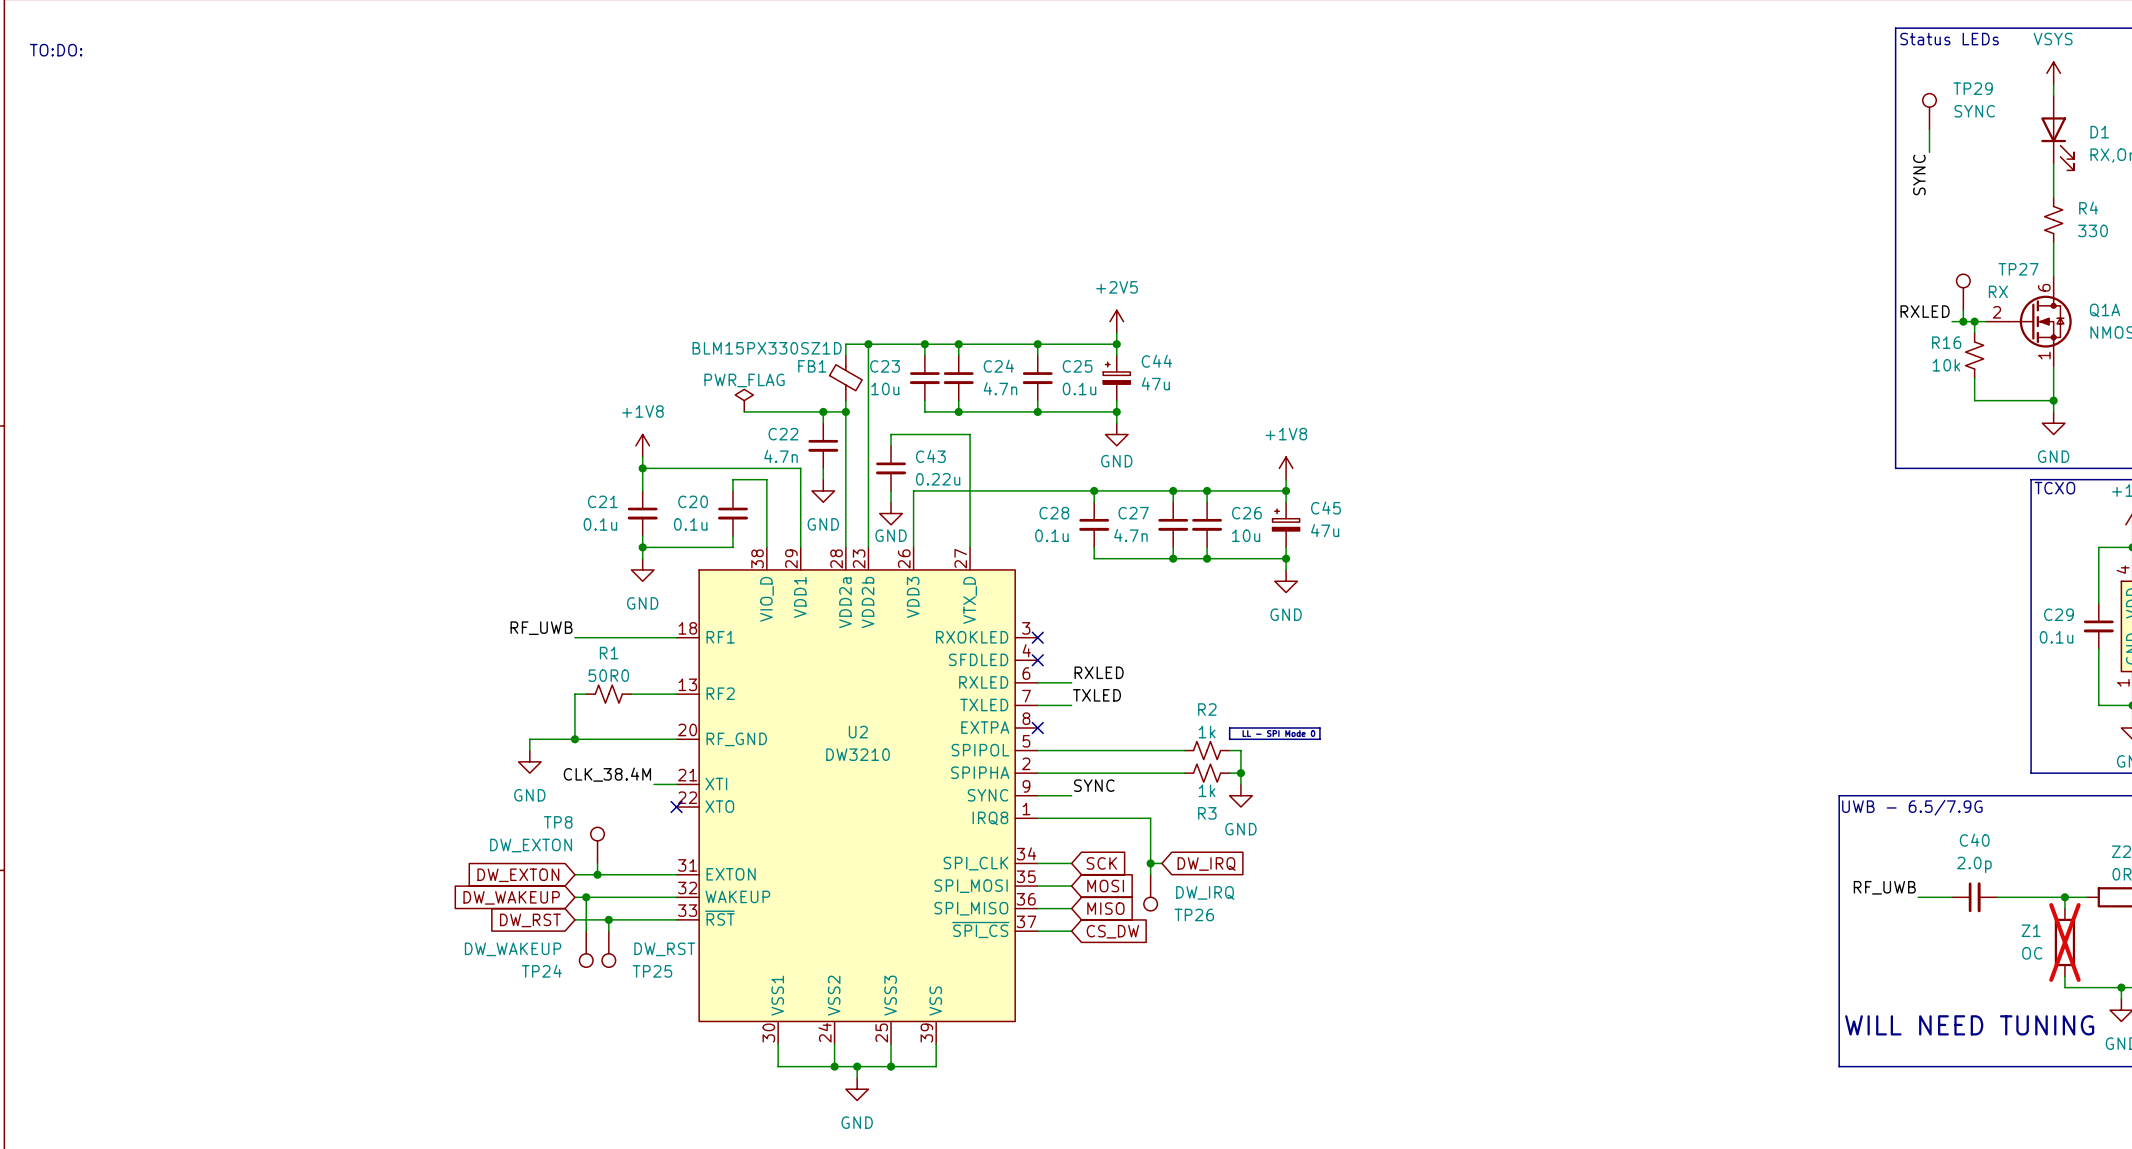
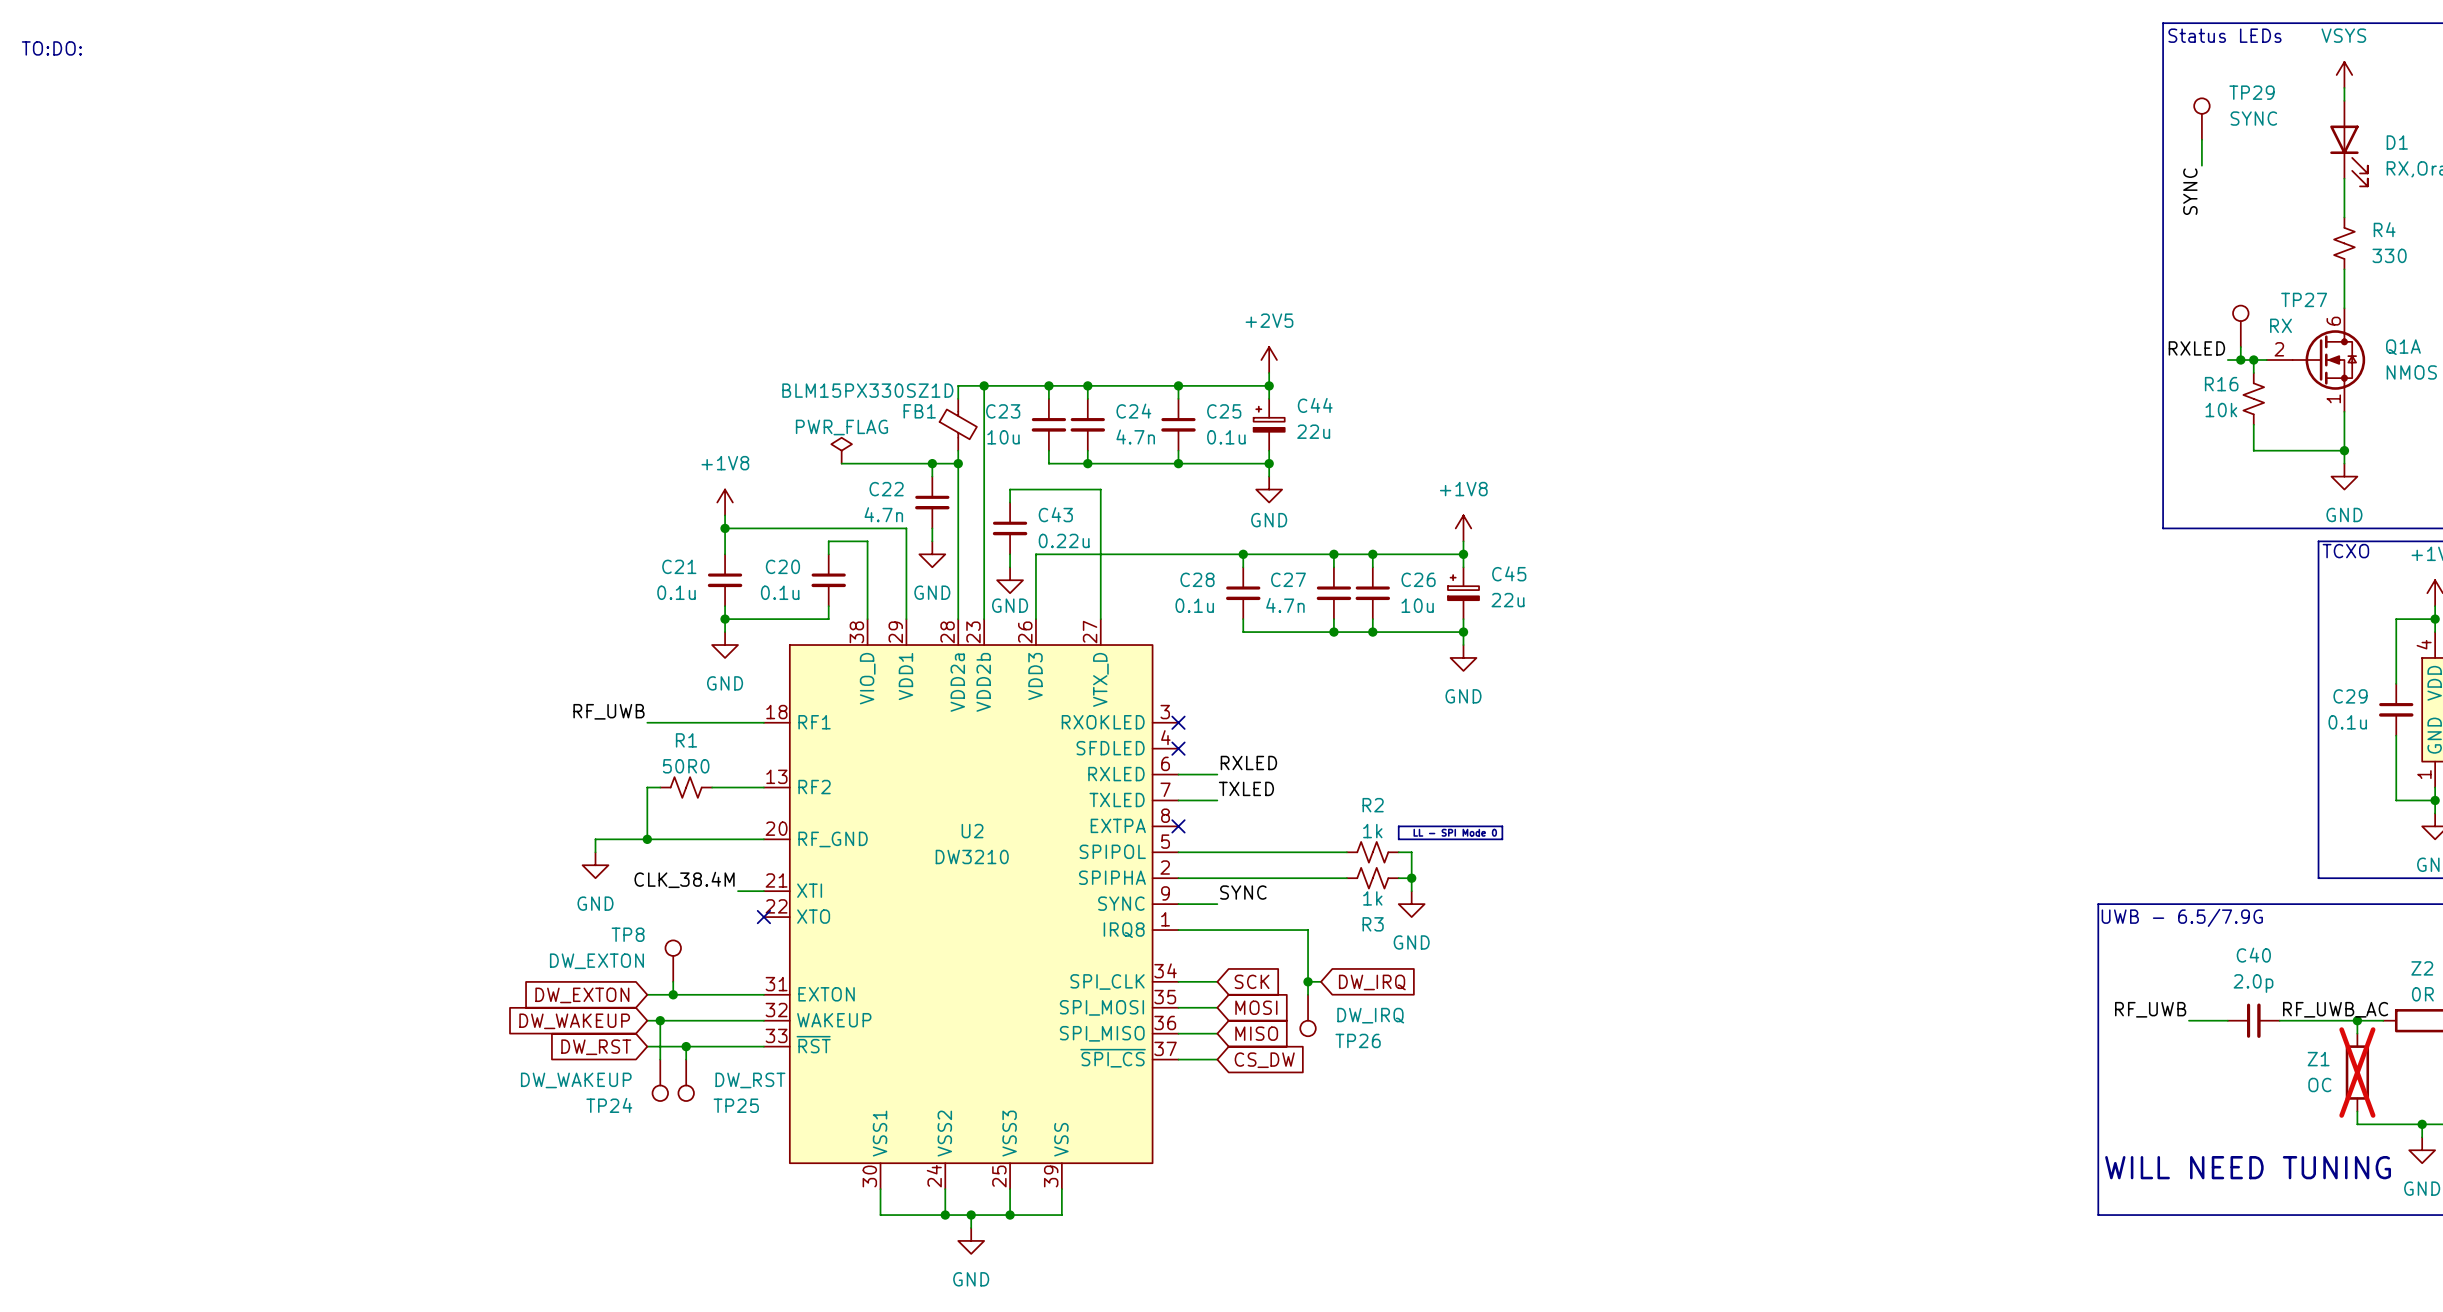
C44 value: 47u (1155, 383) -> 22u (1313, 431)
C45 value: 47u (1325, 530) -> 22u (1508, 600)
label: none -> RF_UWB_AC (2335, 1009)

